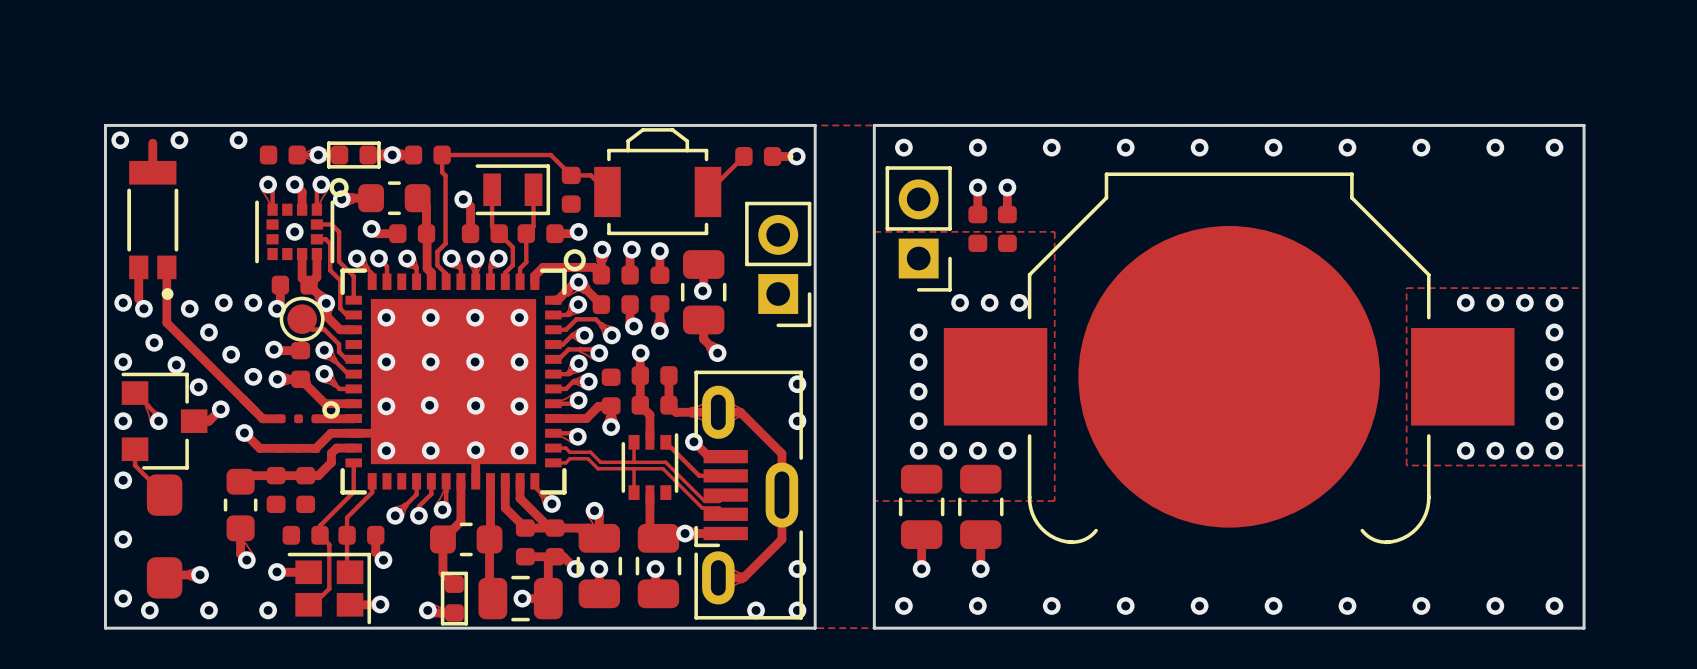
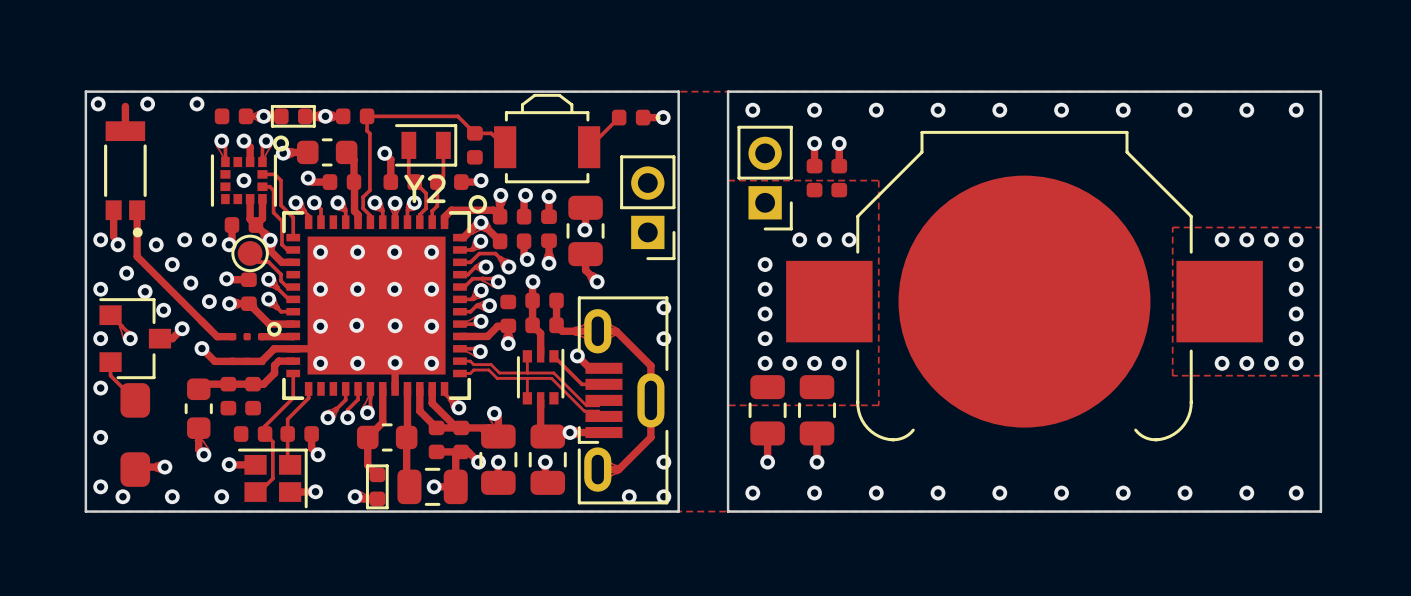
Y2 name: none -> Y2 (424, 188)

